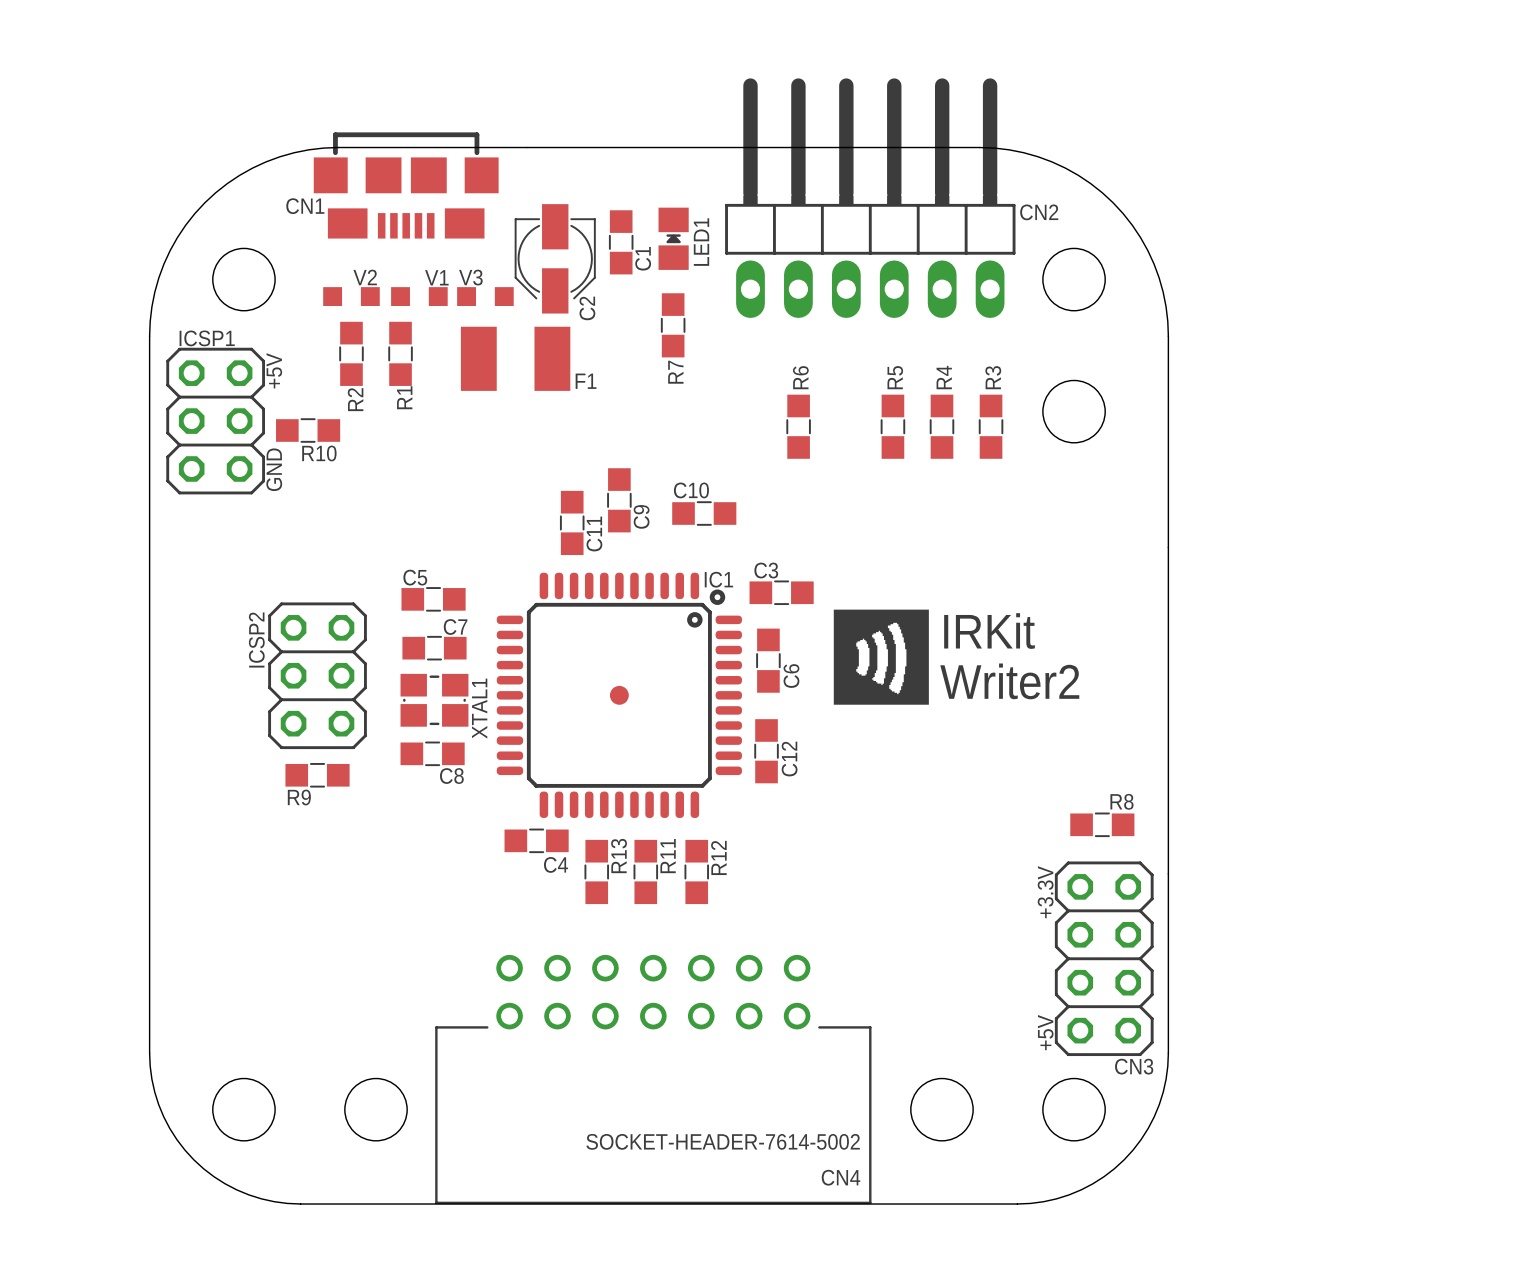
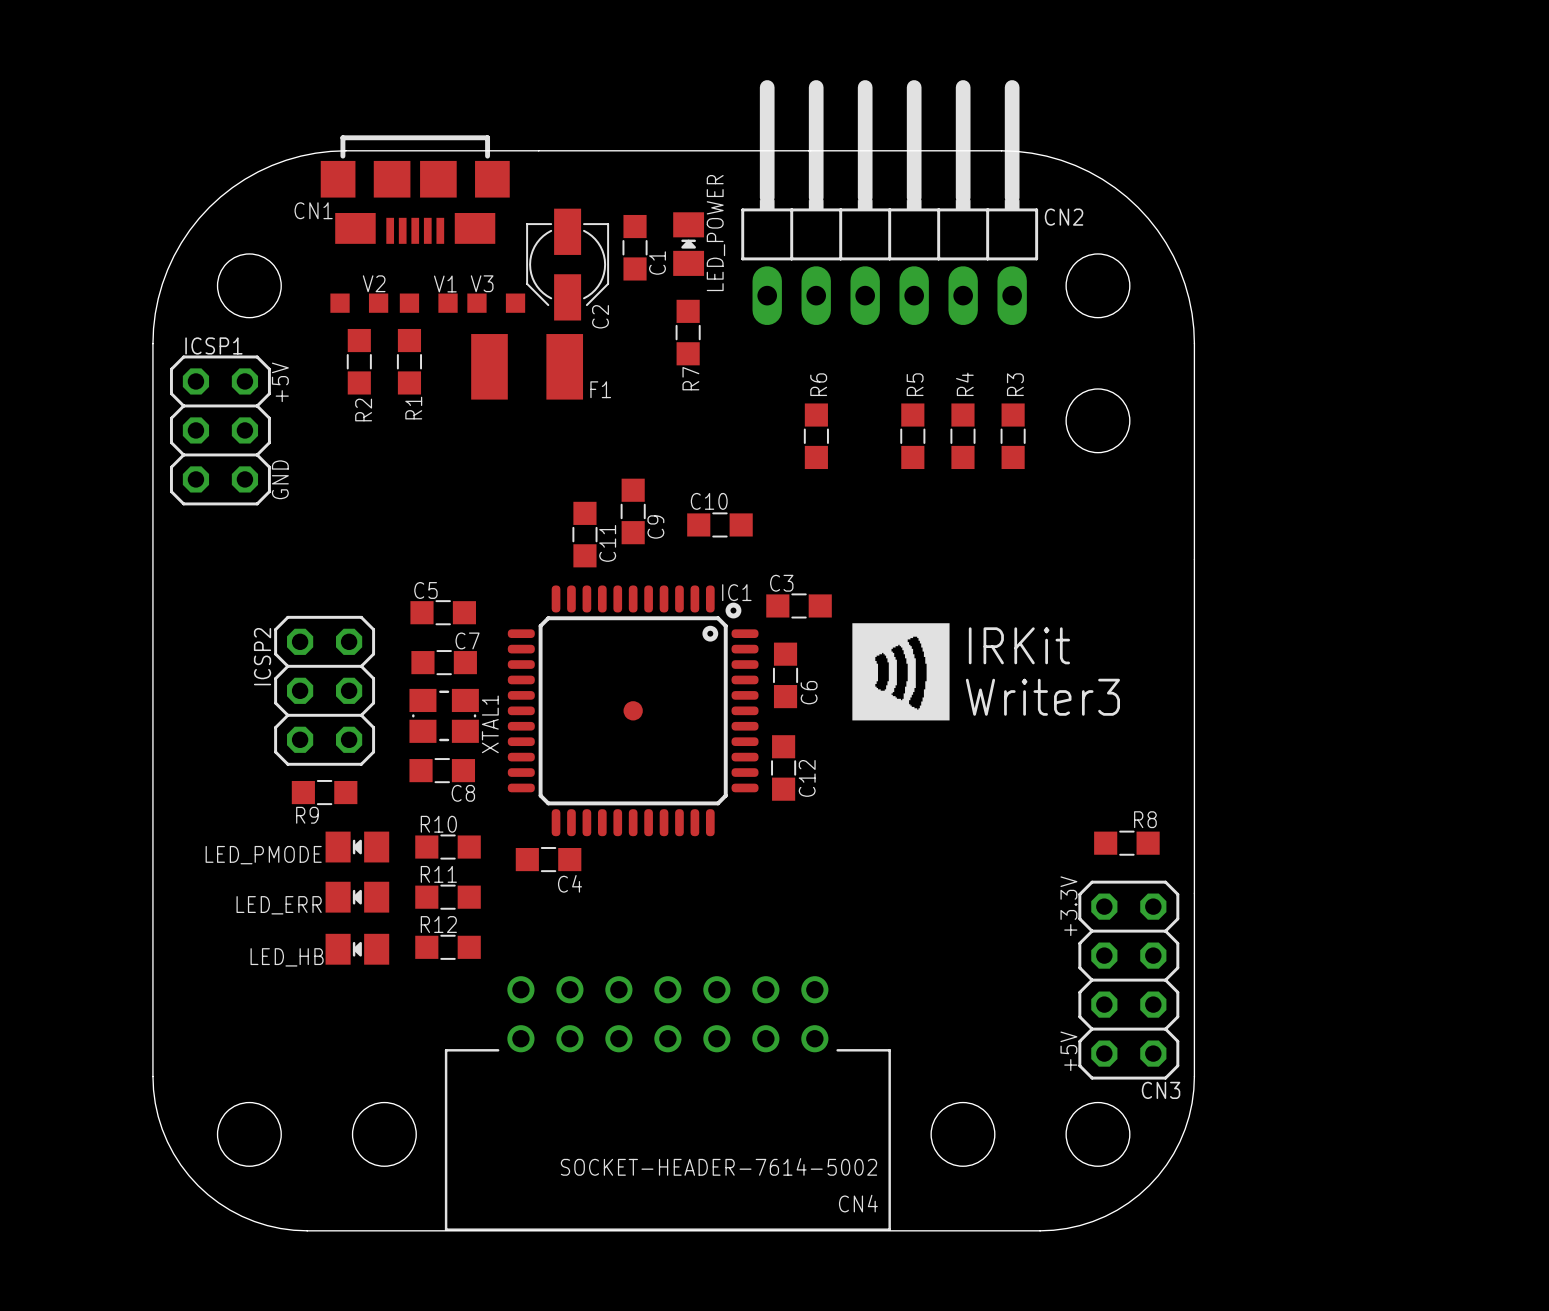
LED1 name: LED1 (701, 242) -> LED_POWER (715, 233)
R10 position: (308, 430) -> (448, 847)
R10 name position: R10 (319, 453) -> R10 (438, 824)
text: Writer2 (1009, 681) -> Writer3 (1042, 697)
LED_PMODE: none -> (357, 847)
R13: (596, 871) -> none
R11 rotation: 0° (645, 871) -> 90° clockwise (448, 897)
R11 position: (645, 871) -> (448, 897)
R12 rotation: 0° (696, 871) -> 90° clockwise (448, 947)
R12 position: (696, 871) -> (448, 947)
LED_ERR: none -> (357, 897)
LED_HB: none -> (357, 949)

